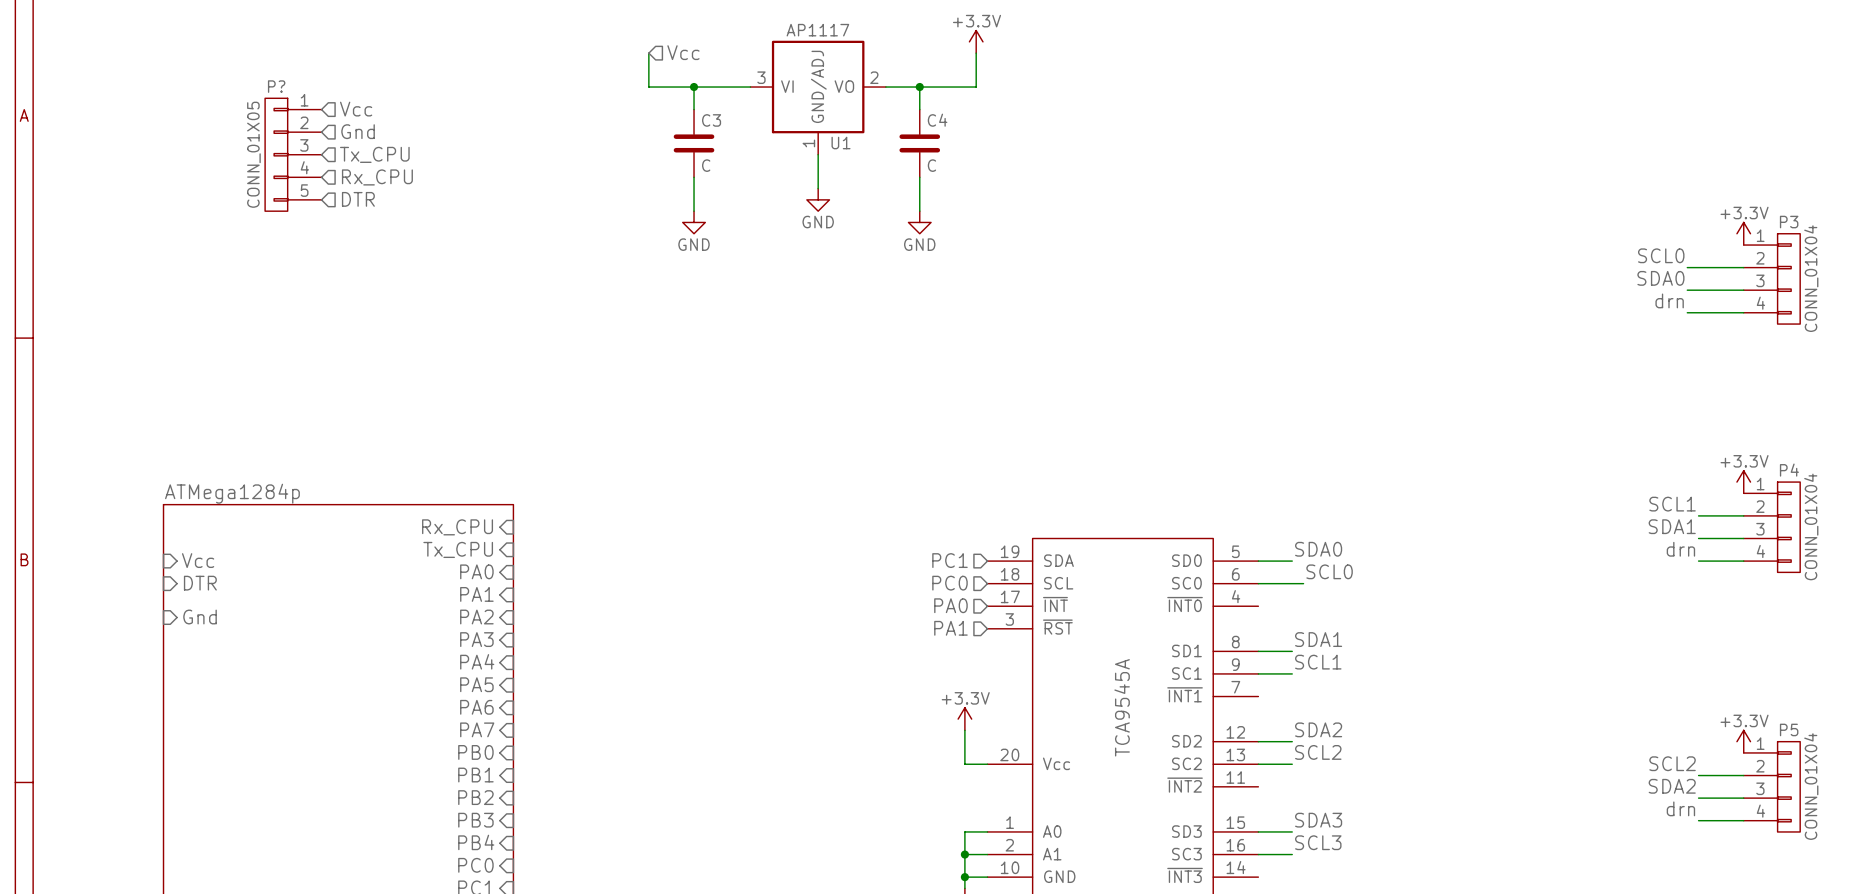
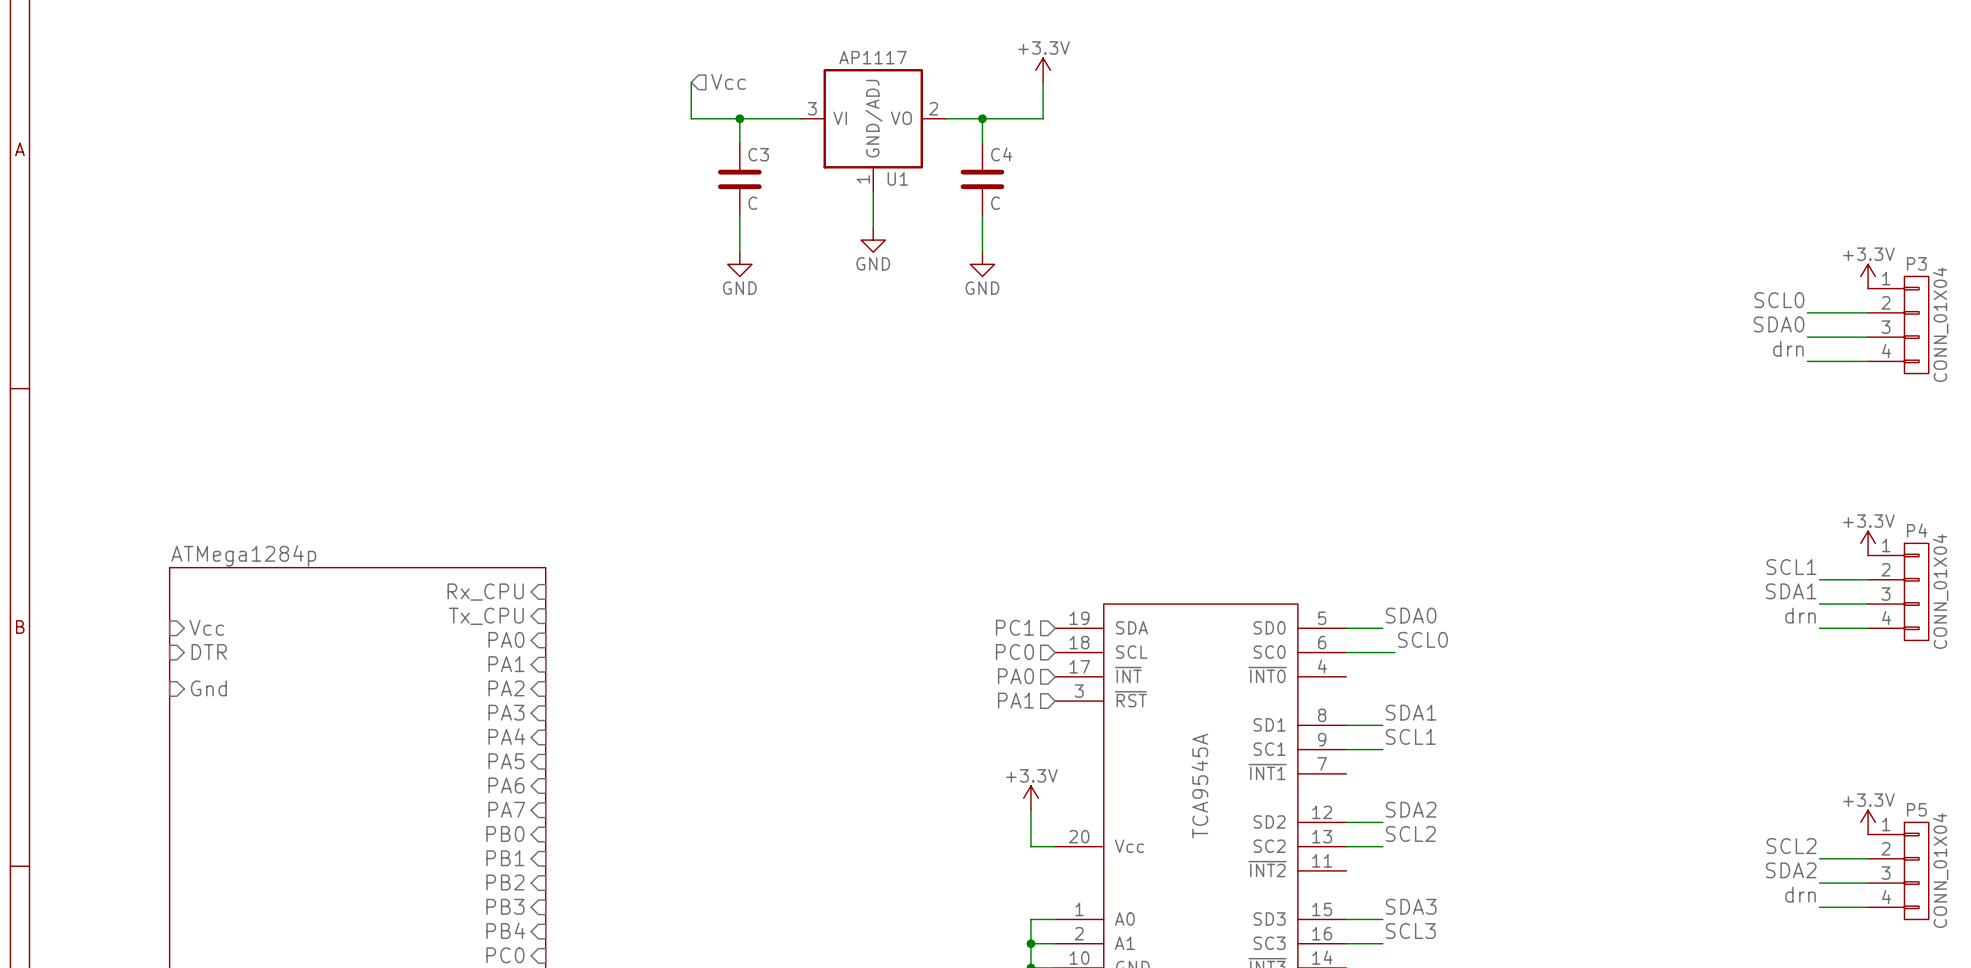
hierarchical label: Vcc (356, 109) -> none
hierarchical label: Gnd (358, 131) -> none
P?: CONN_01X05 (293, 154) -> none
hierarchical label: Tx_CPU (374, 154) -> none
hierarchical label: Rx_CPU (377, 177) -> none
hierarchical label: DTR (358, 199) -> none

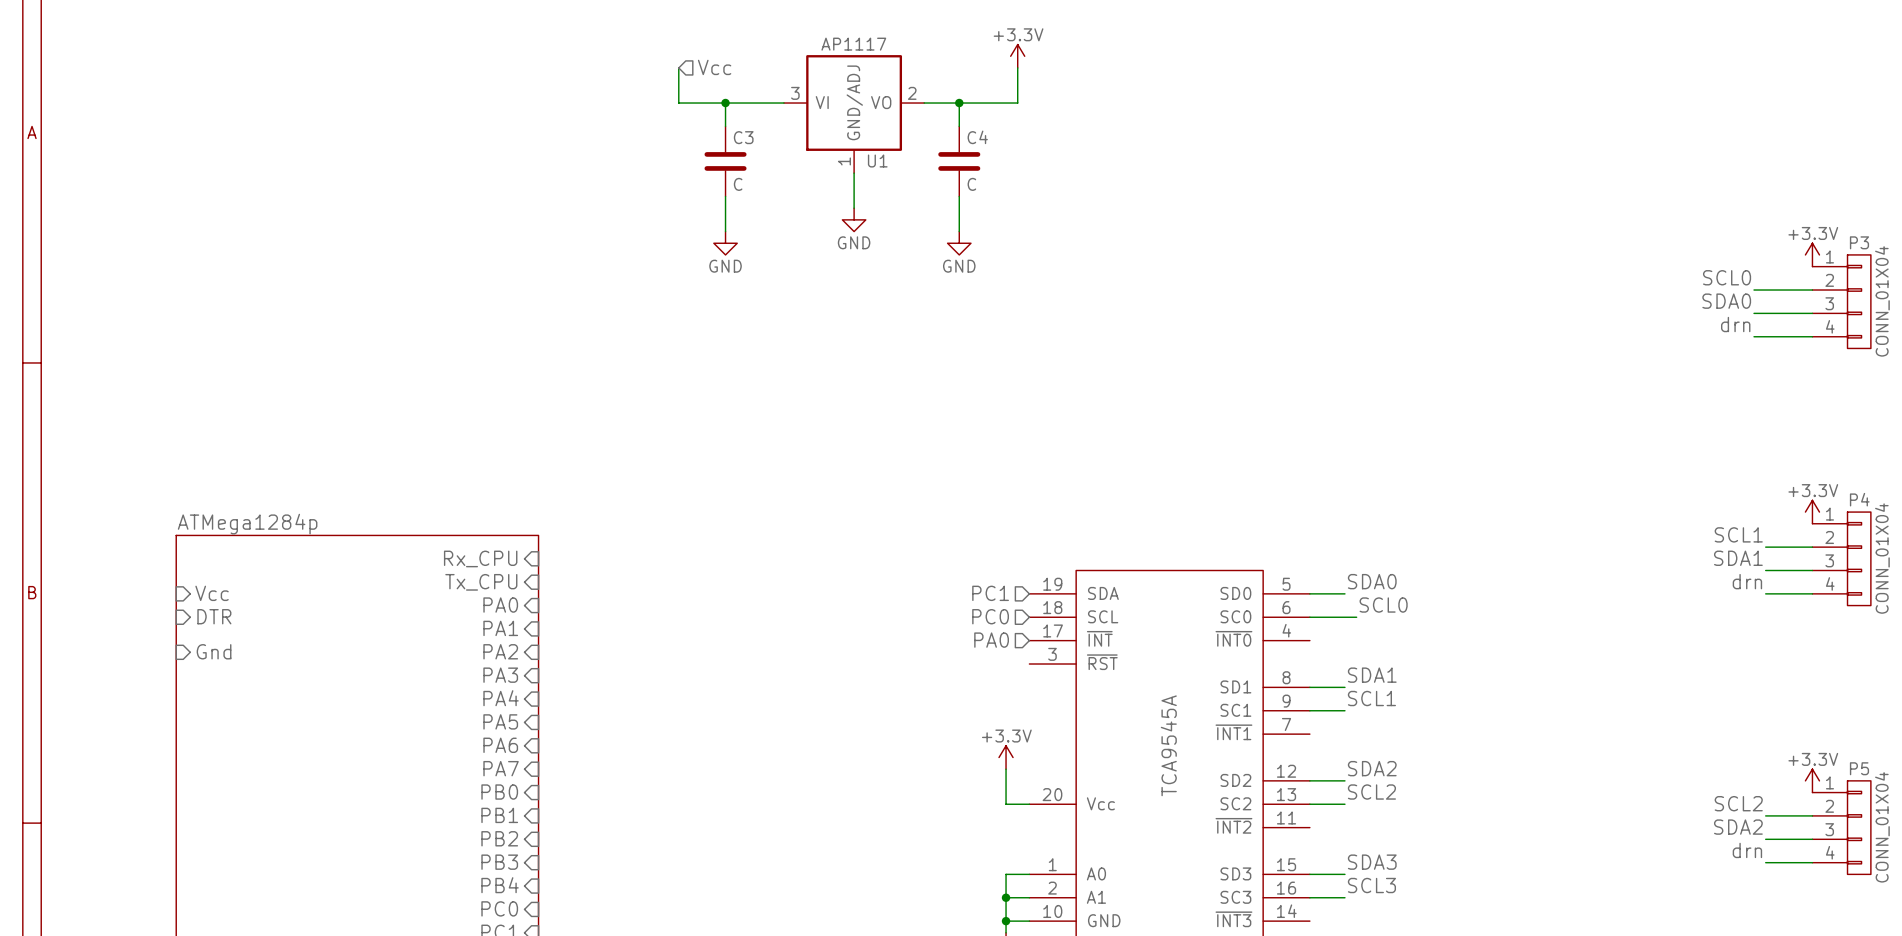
hierarchical label: PA1 (1015, 700) -> none

